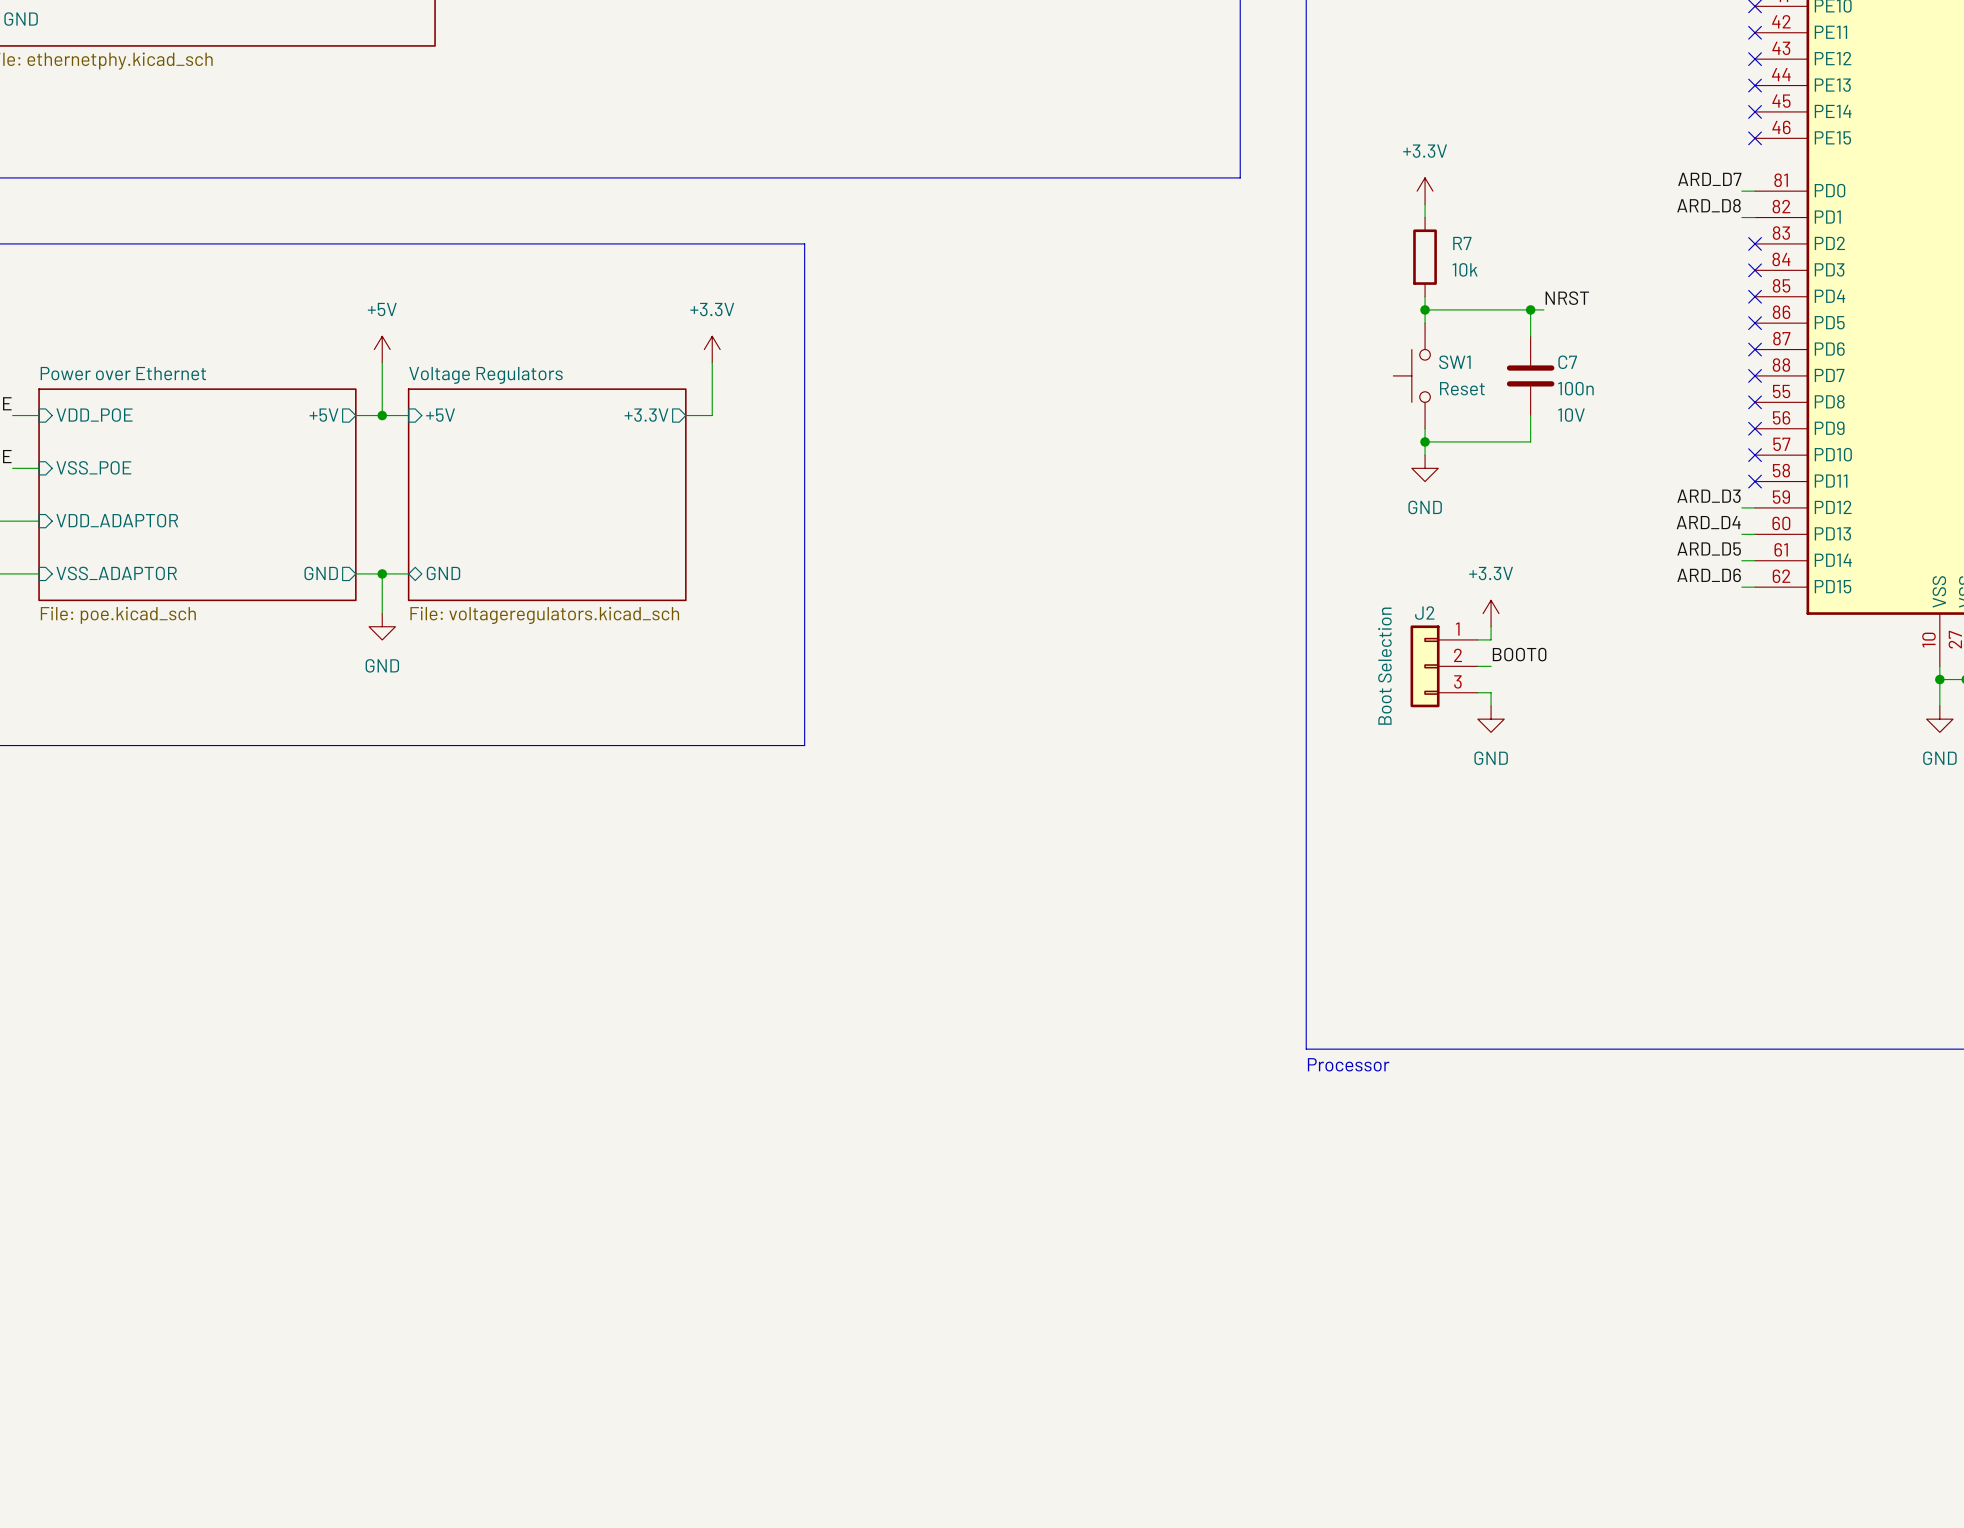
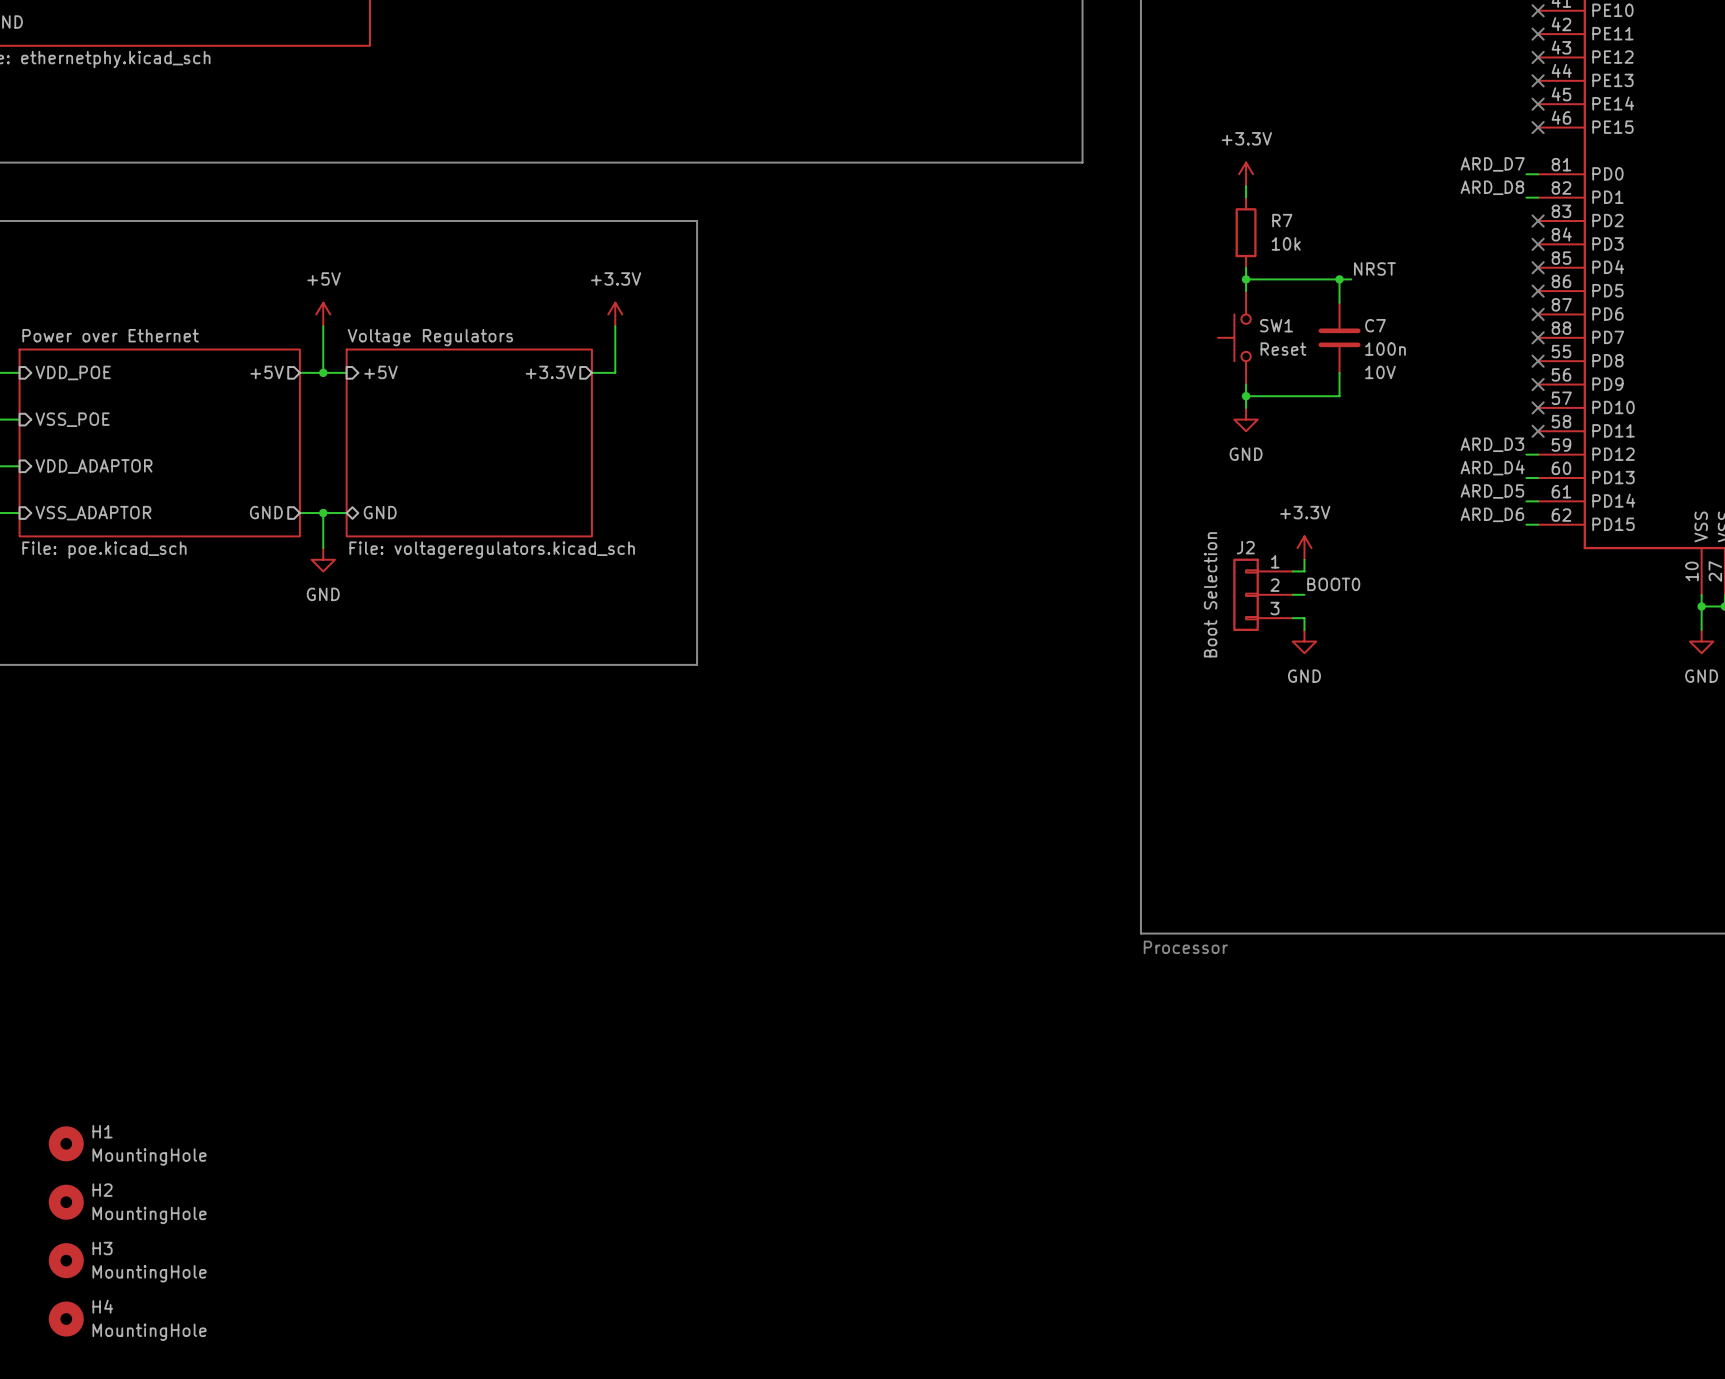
H1: none -> MountingHole (66, 1143)
H2: none -> MountingHole (66, 1202)
H3: none -> MountingHole (66, 1260)
H4: none -> MountingHole (66, 1319)

